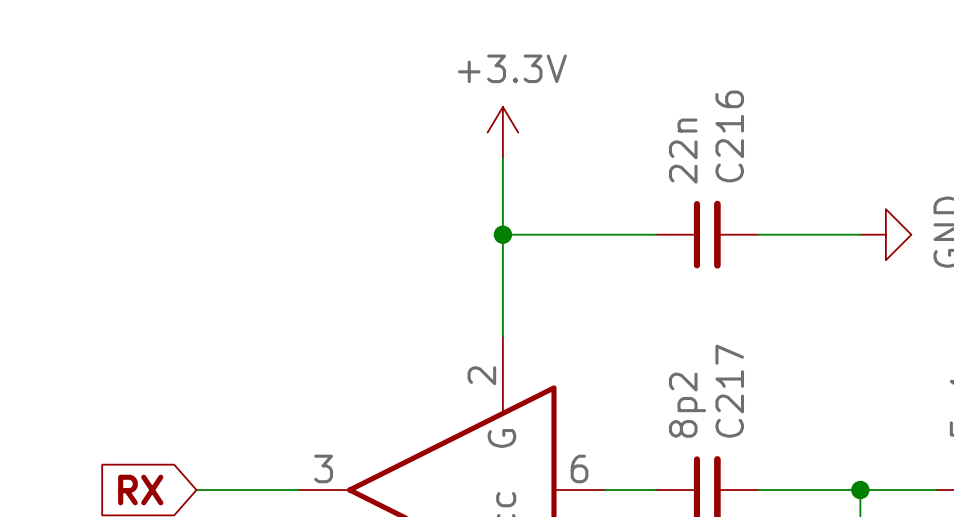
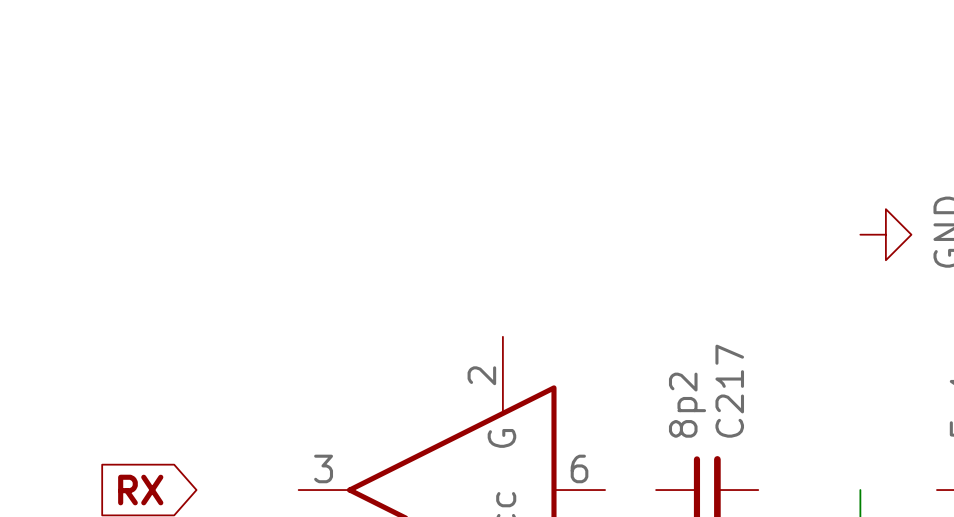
power symbol: +3.3V (502, 132) -> none
wire: (502, 158) (502, 336) -> none
wire: (502, 234) (656, 234) -> none
junction: (502, 234) -> none
C216: 22n (707, 234) -> none
wire: (758, 234) (860, 234) -> none
wire: (196, 490) (298, 490) -> none
wire: (605, 490) (656, 490) -> none
wire: (758, 490) (936, 490) -> none
junction: (860, 490) -> none

